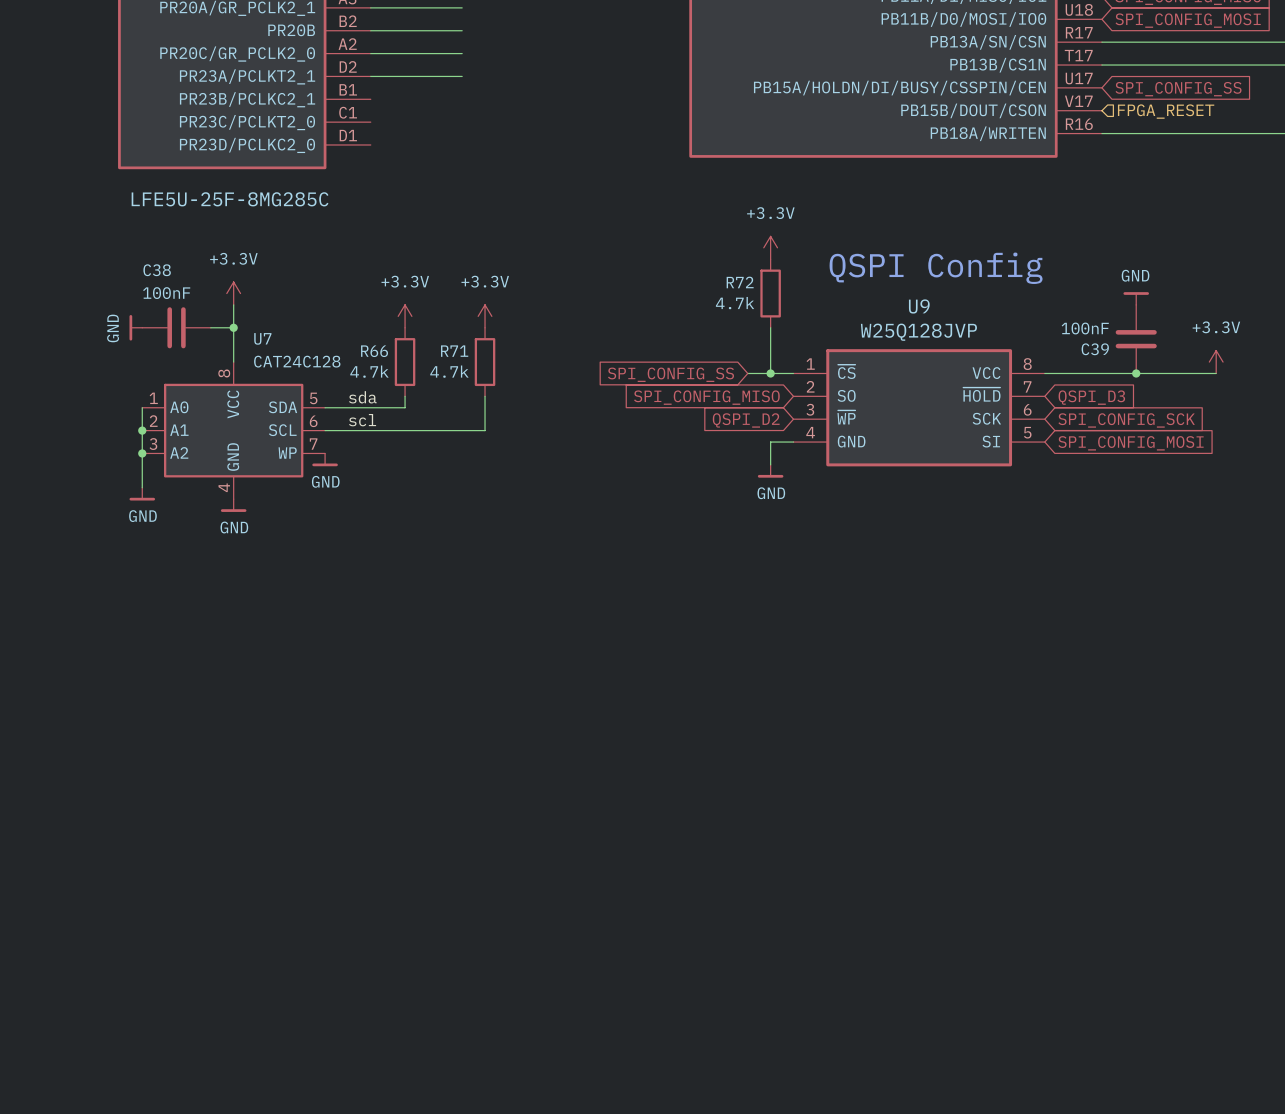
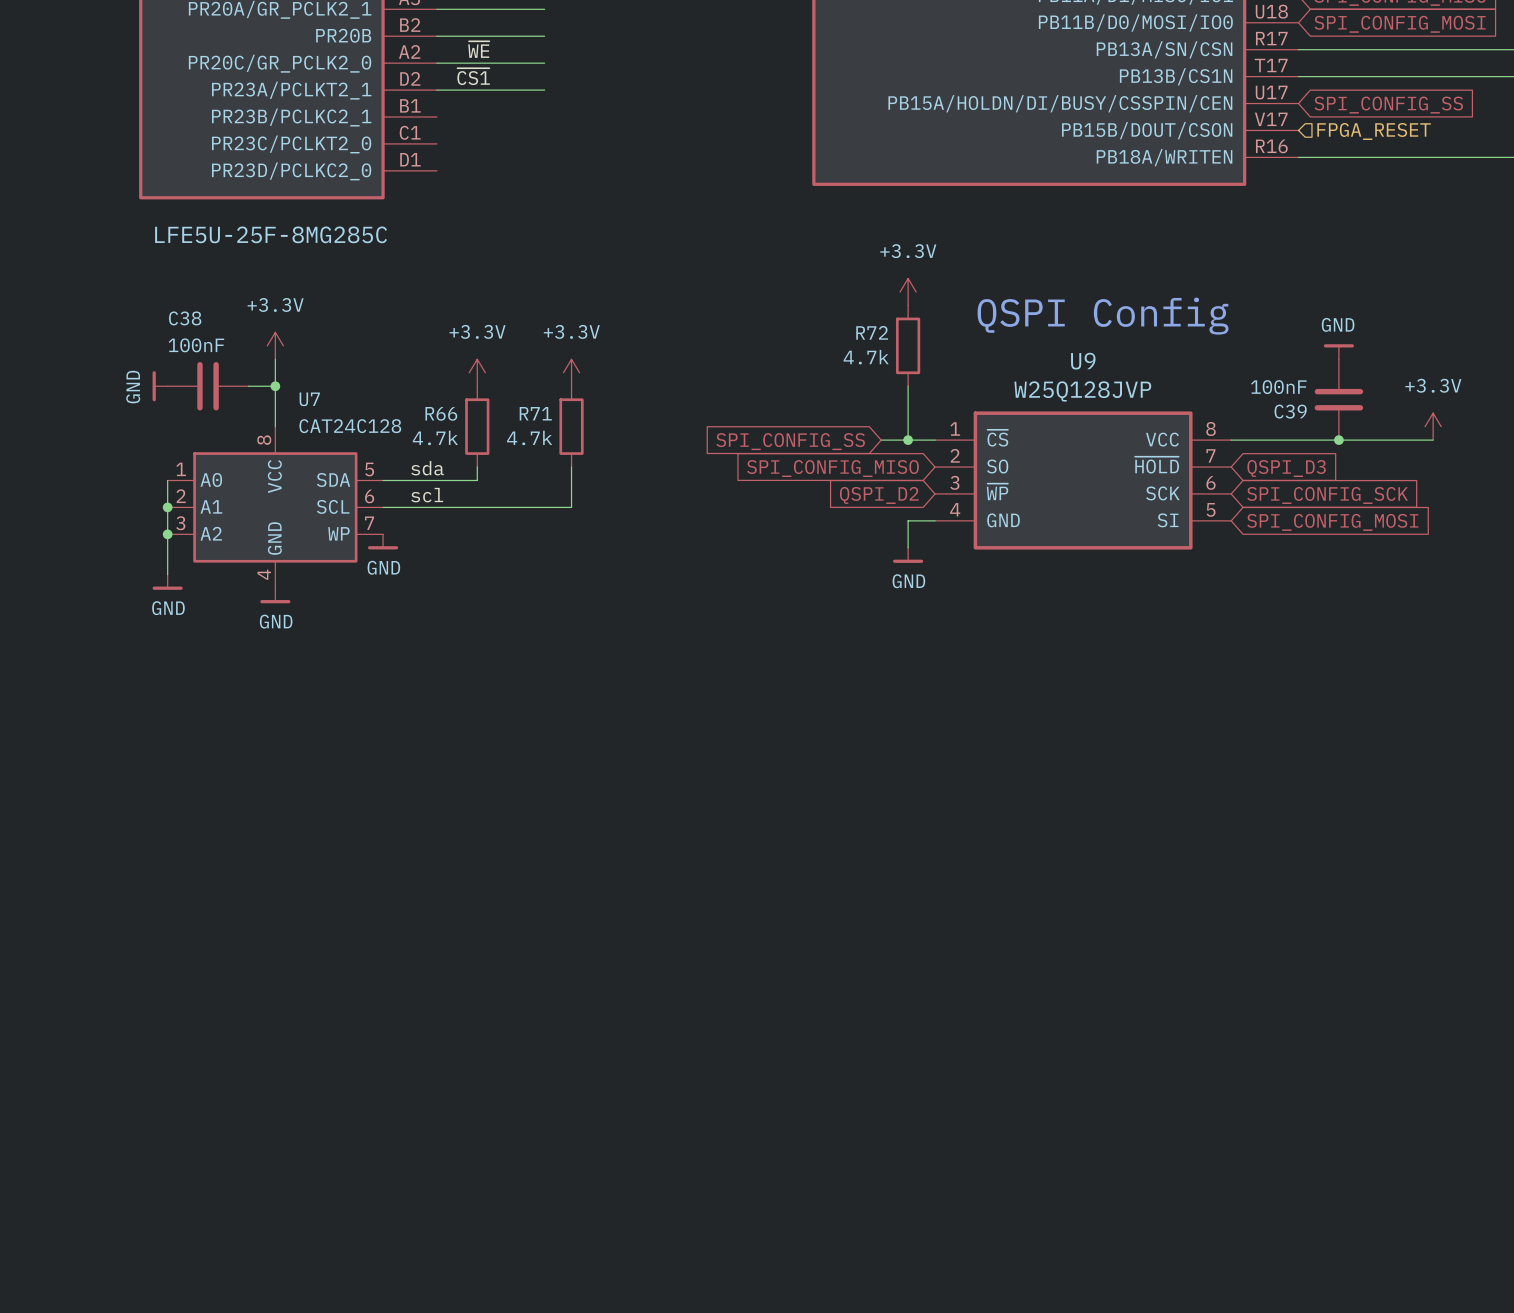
label: none -> ~{WE} (478, 49)
label: none -> ~{CS1} (473, 76)

